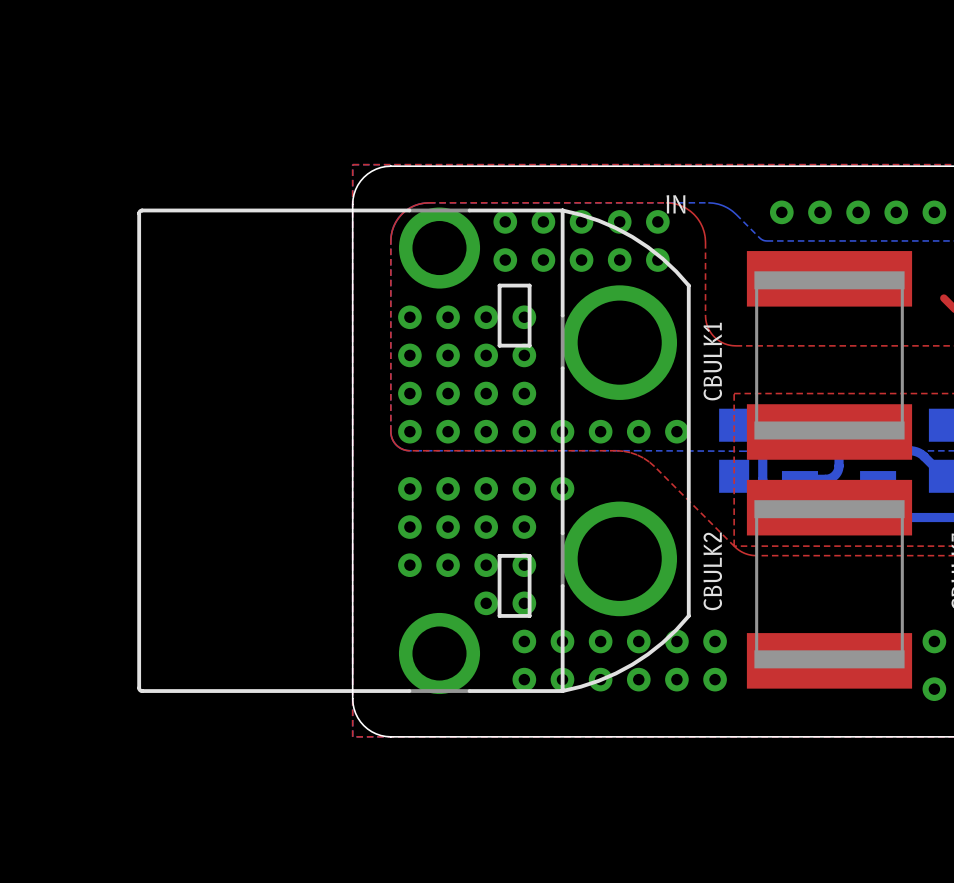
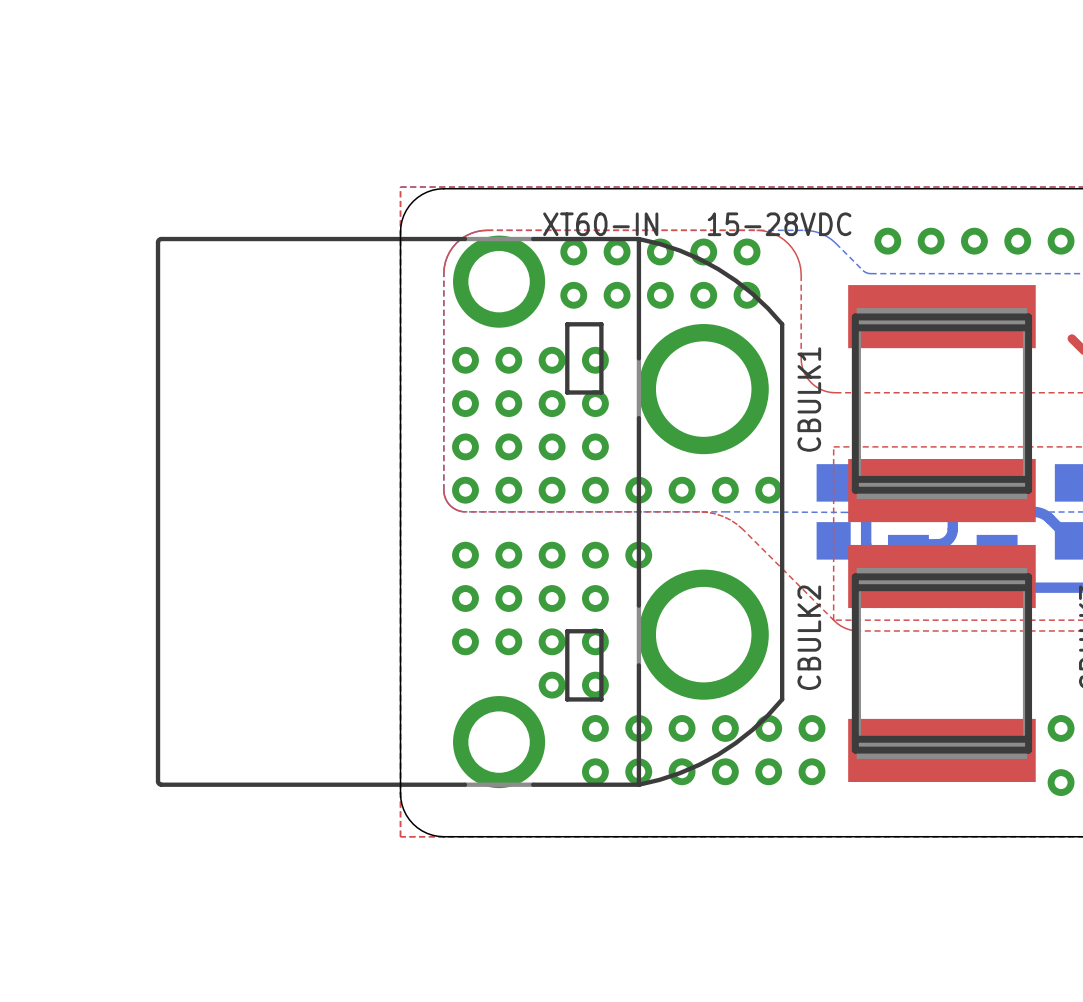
text: none -> 15-28VDC (779, 224)
IN name: IN (675, 204) -> XT60-IN (600, 224)
line: none -> (855, 316) (1028, 316) (1028, 490) (855, 490) (855, 316)
line: none -> (855, 327) (1028, 327)
line: none -> (855, 479) (1028, 479)
line: none -> (855, 576) (855, 750) (1028, 750) (1028, 576) (855, 576)
line: none -> (855, 587) (1028, 587)
line: none -> (855, 739) (1028, 739)

